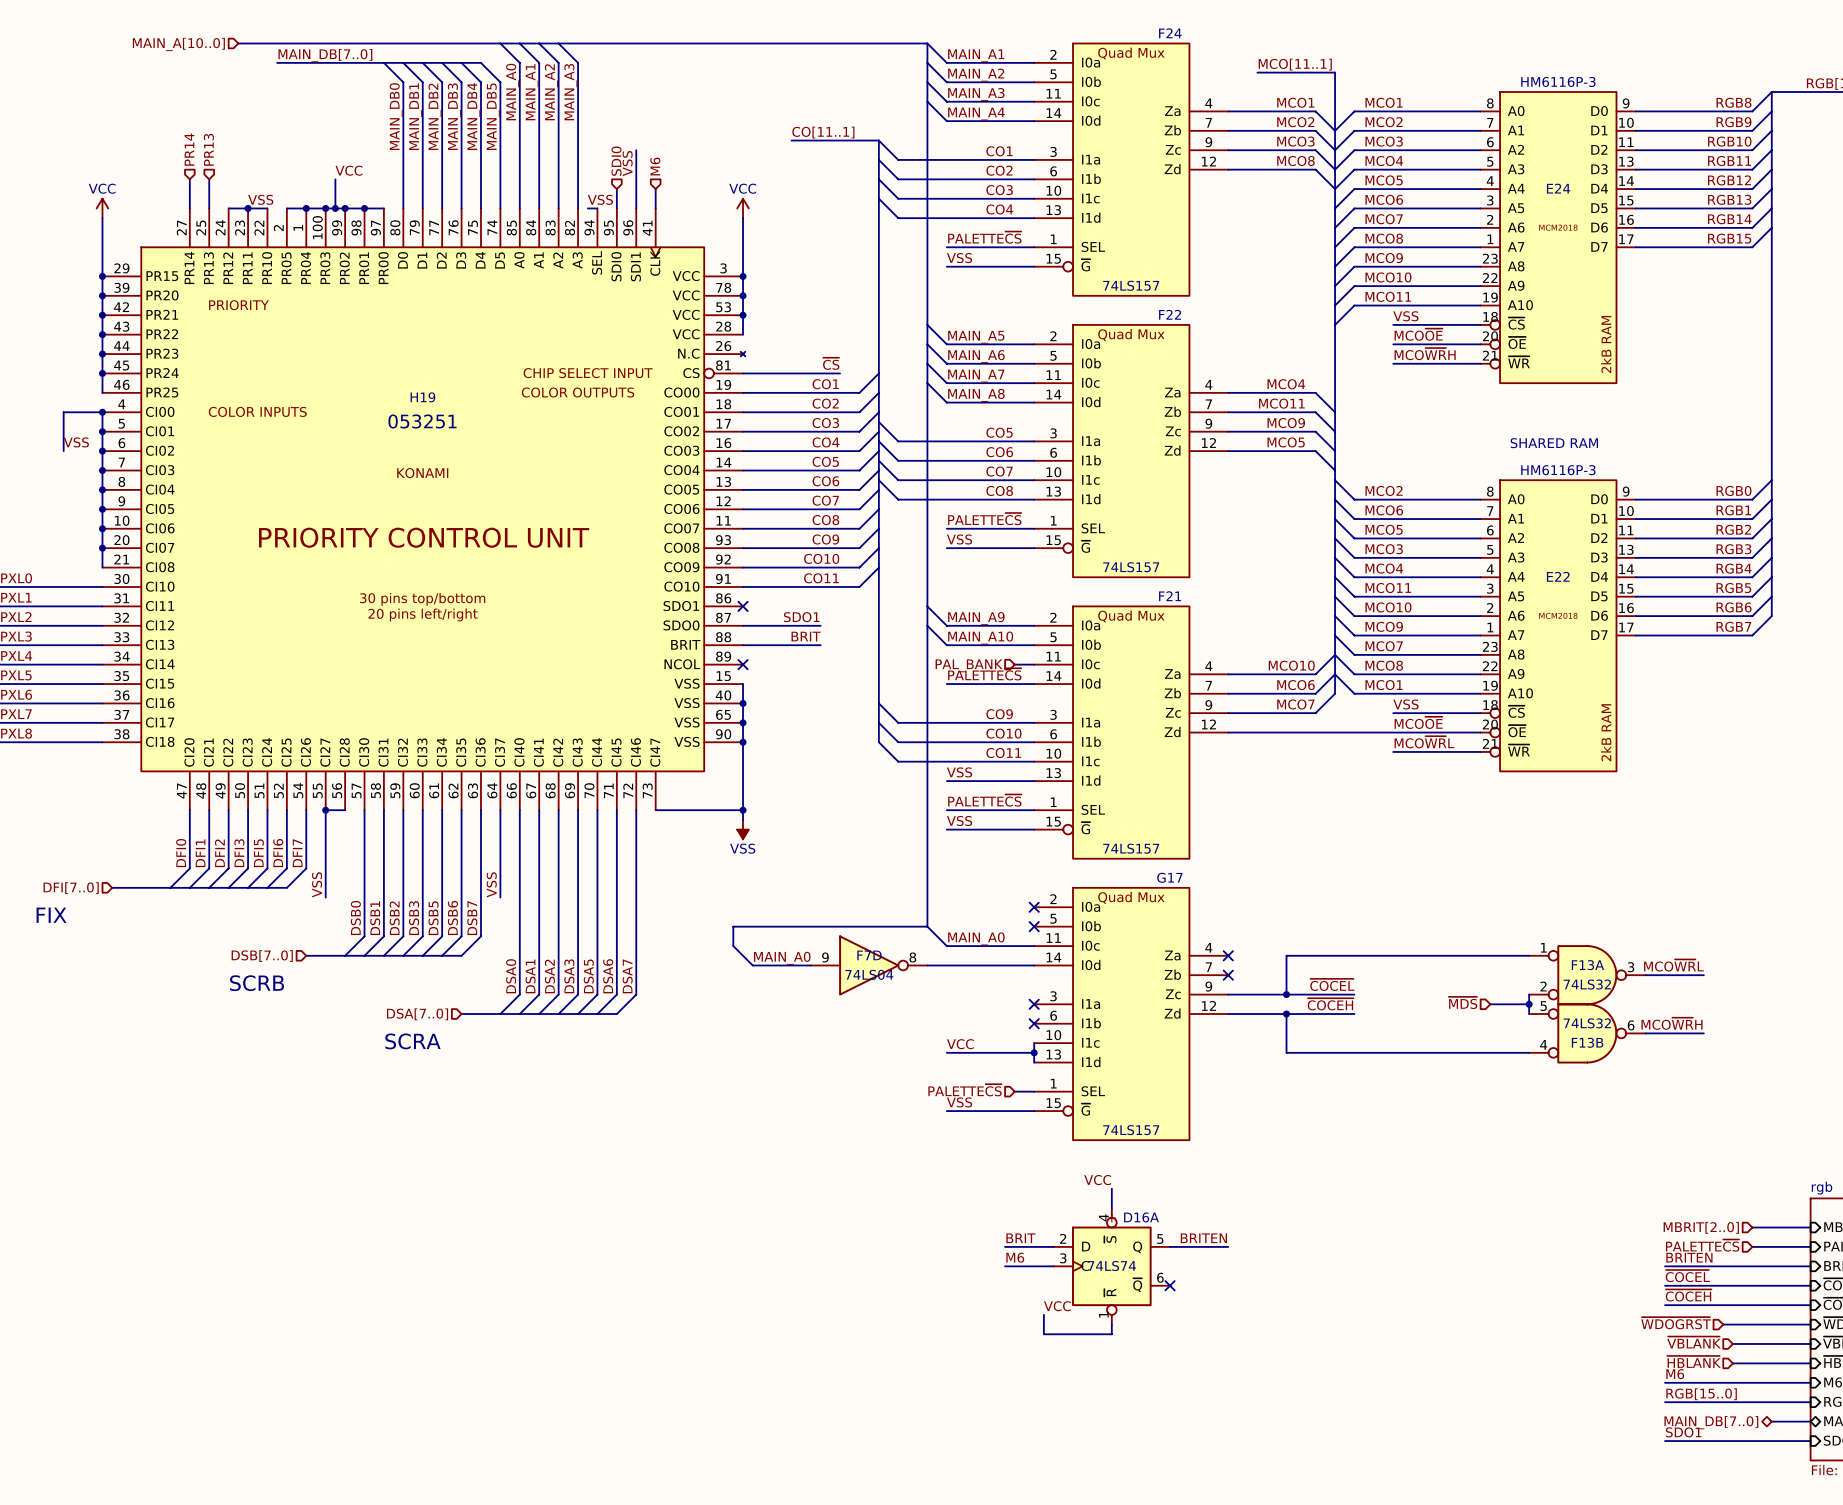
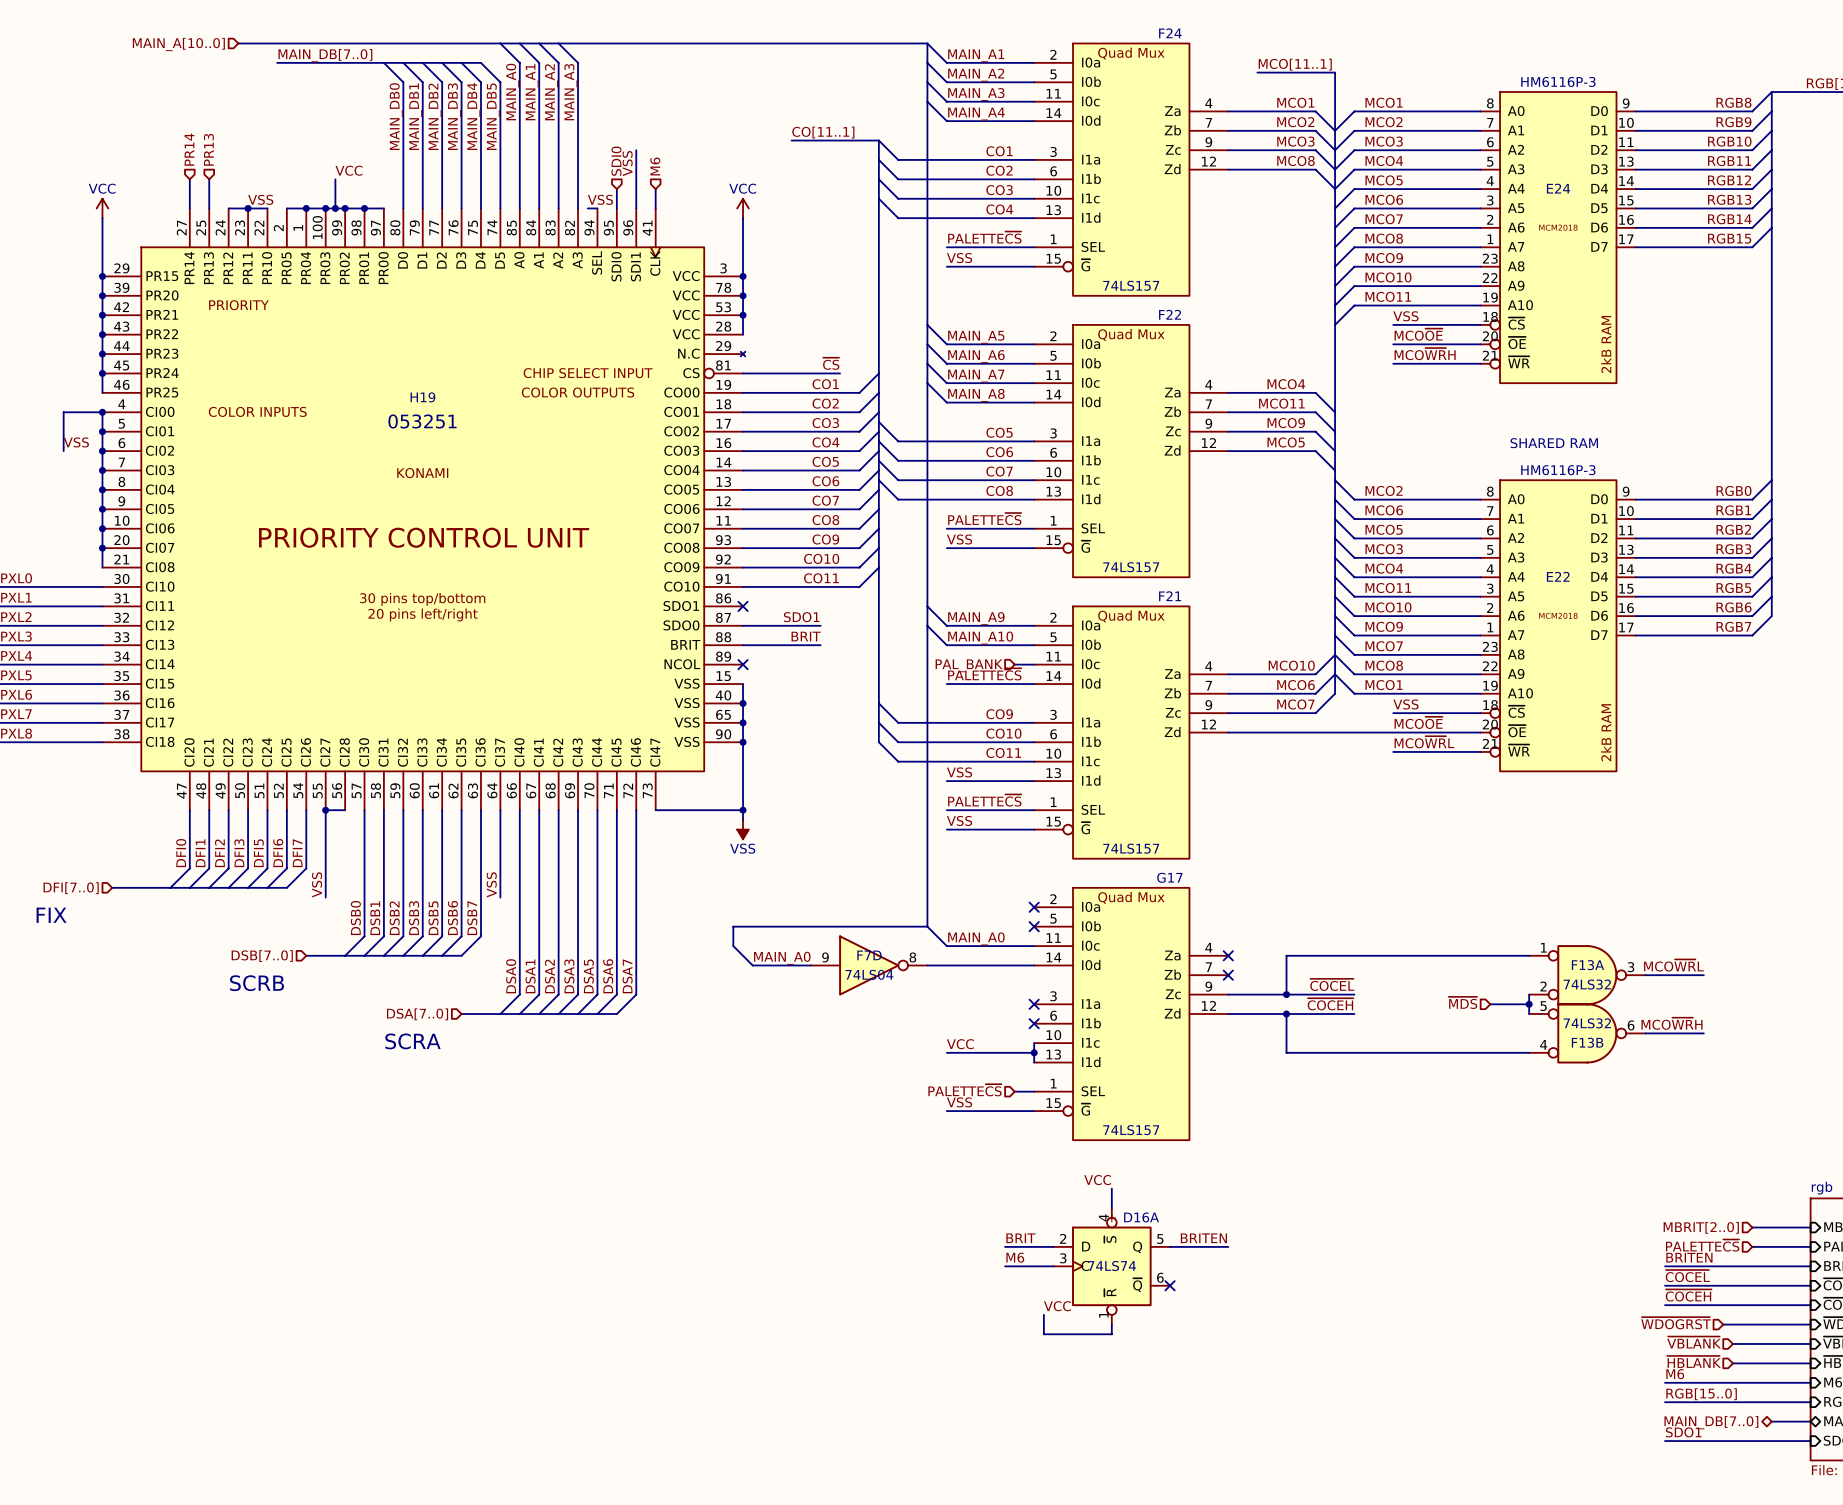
H19 pin number: 26 (723, 346) -> 29 (723, 346)

